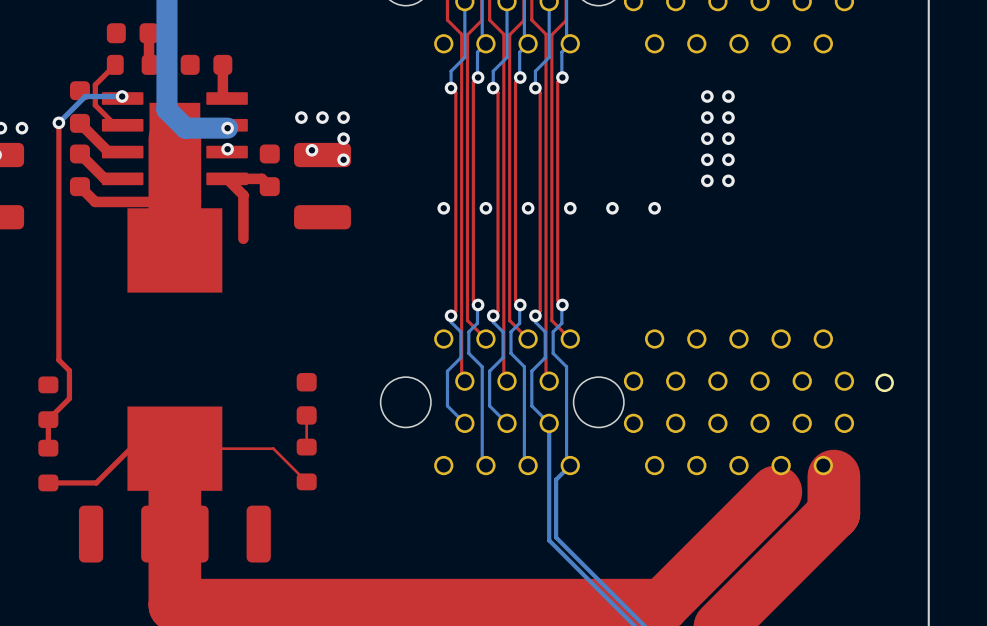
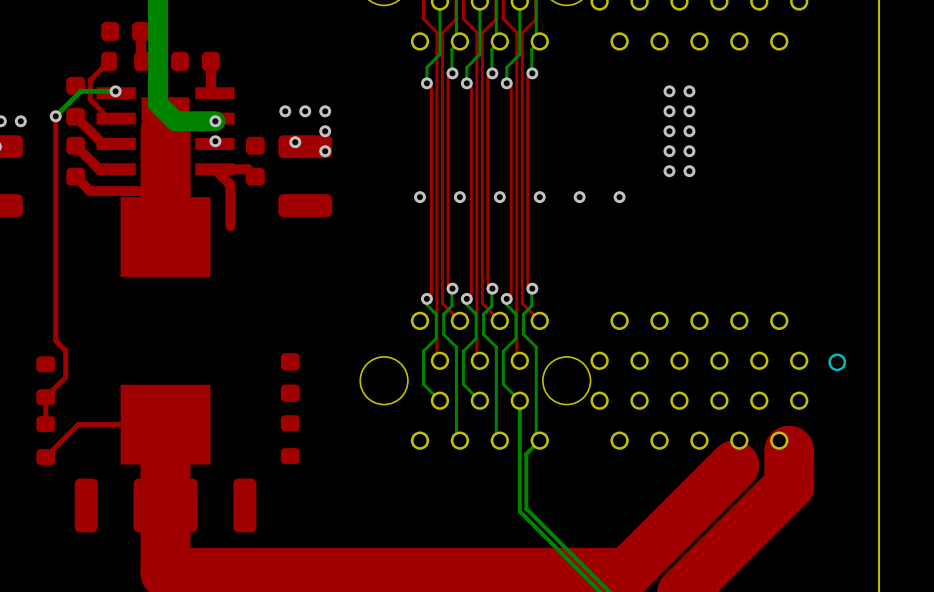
top track: (306, 415) (306, 447) -> none
top track: (130, 448) (96, 482) (48, 482) -> (123, 424) (78, 424) (45, 457)
top track: (174, 448) (273, 448) (306, 481) -> none

